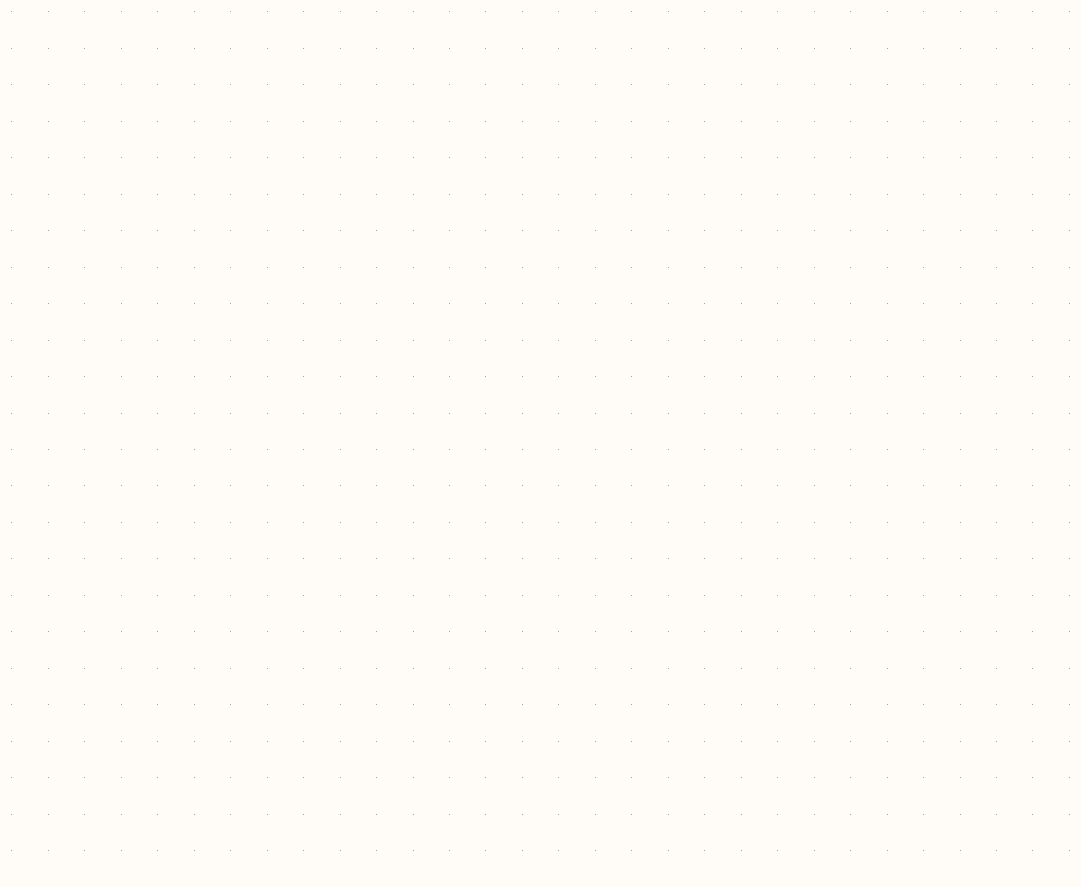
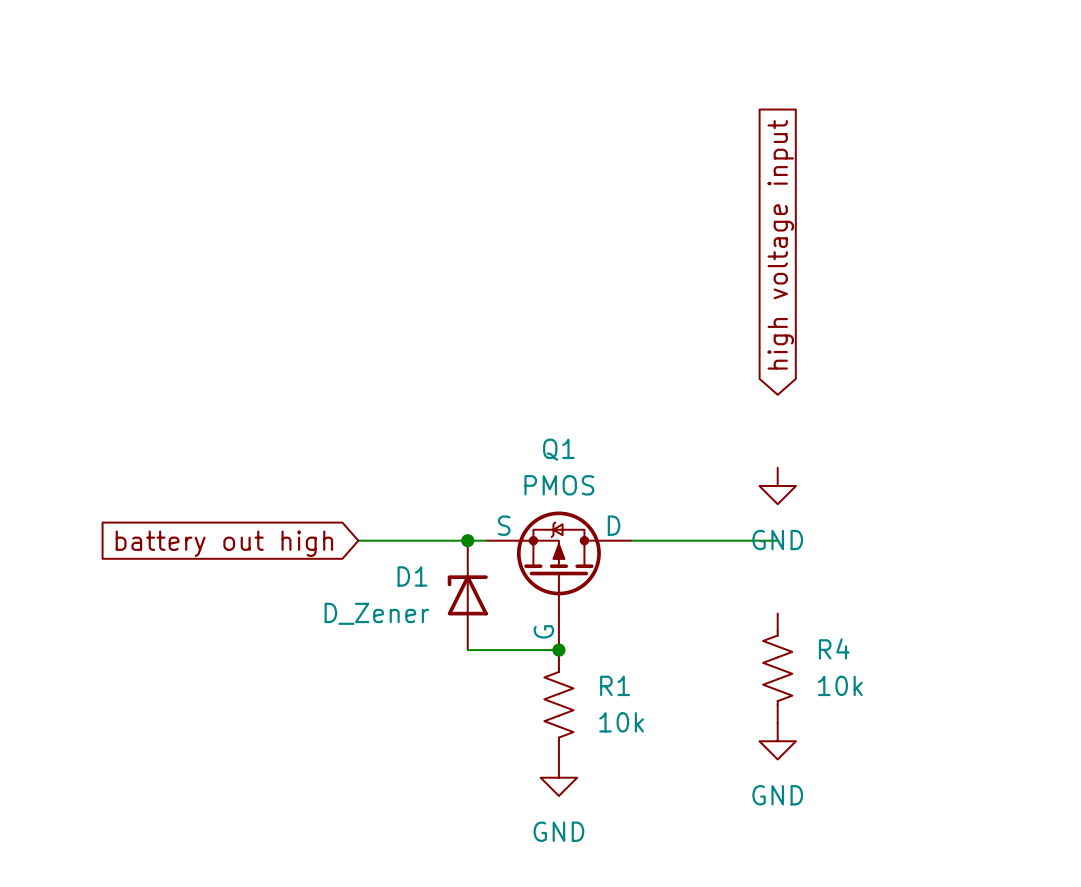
global label: none -> high voltage input (780, 244)
power symbol: none -> GND (777, 485)
wire: none -> (358, 540) (485, 540)
junction: none -> (467, 540)
wire: none -> (631, 540) (777, 540)
global label: none -> battery out high (224, 543)
Q1: none -> PMOS (558, 580)
D1: none -> D_Zener (467, 595)
wire: none -> (467, 650) (558, 650)
junction: none -> (558, 650)
R4: none -> 10k (777, 668)
R1: none -> 10k (558, 704)
power symbol: none -> GND (777, 741)
power symbol: none -> GND (558, 777)

